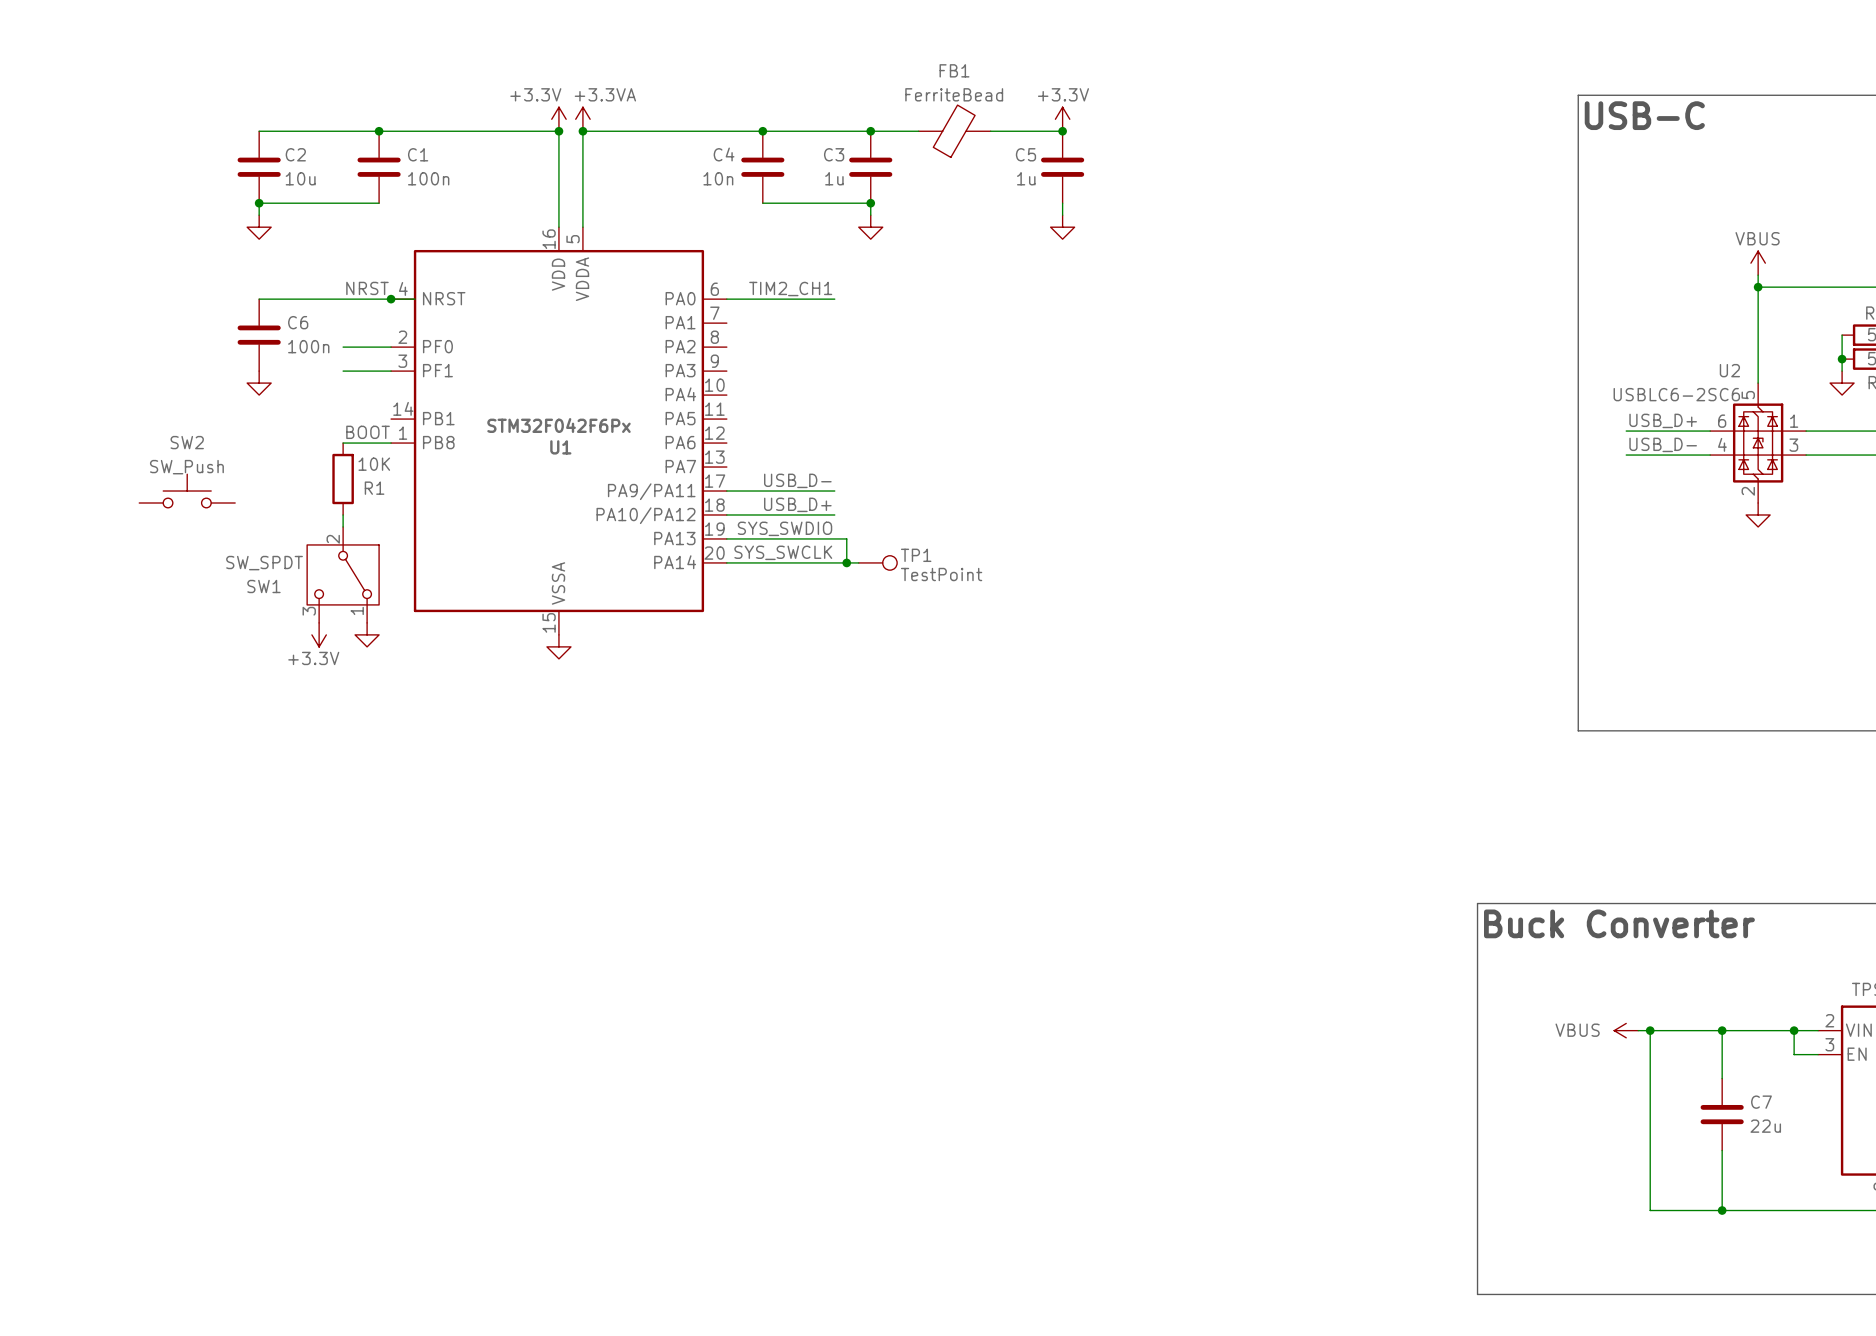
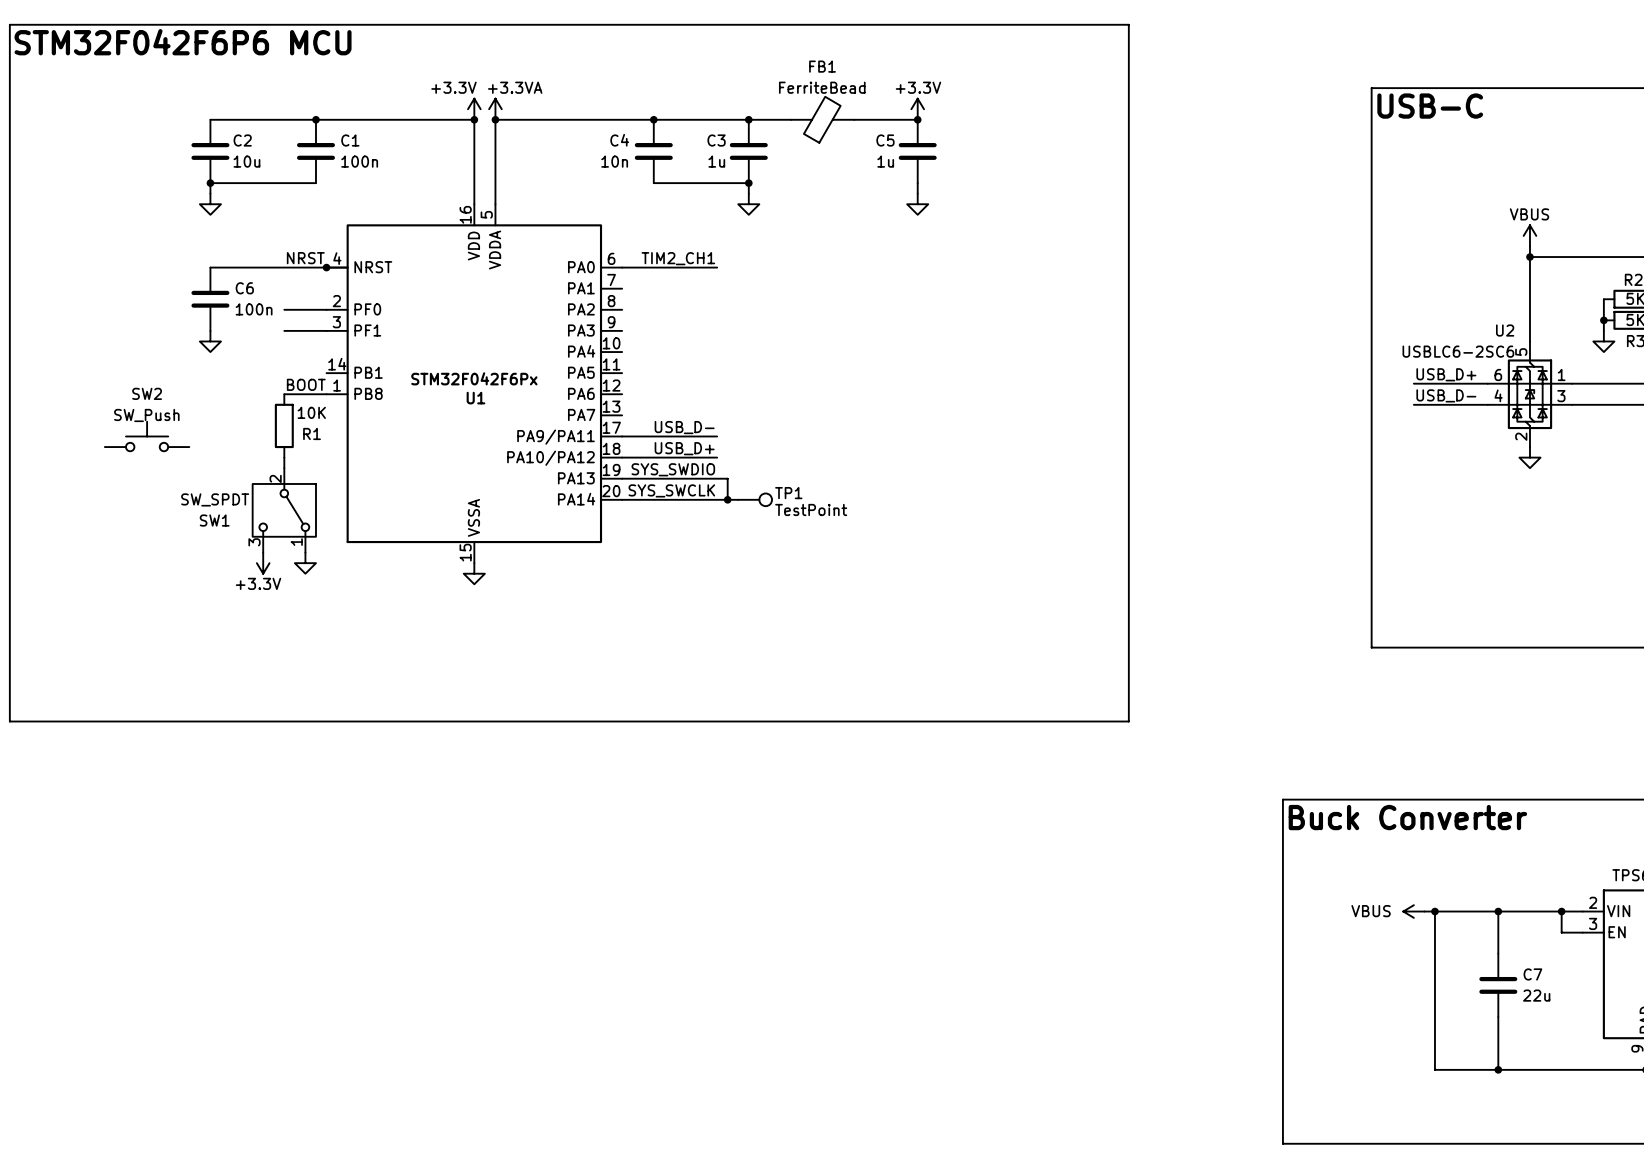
line: none -> (9, 24) (1128, 24) (1128, 721) (9, 721) (9, 24)
text: none -> STM32F042F6P6 MCU (183, 42)

